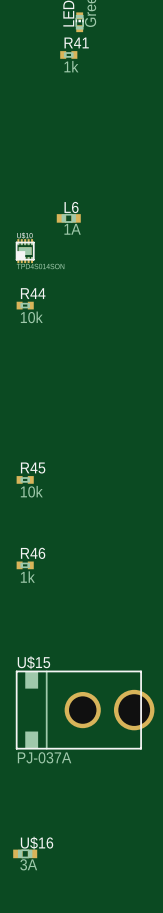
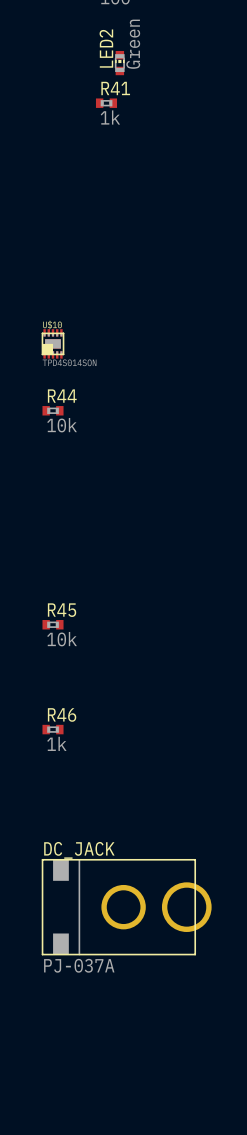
L6: 1A (68, 218) -> none
U$15 name: U$15 (33, 662) -> DC_JACK (79, 850)
U$16: 3A (25, 853) -> none

